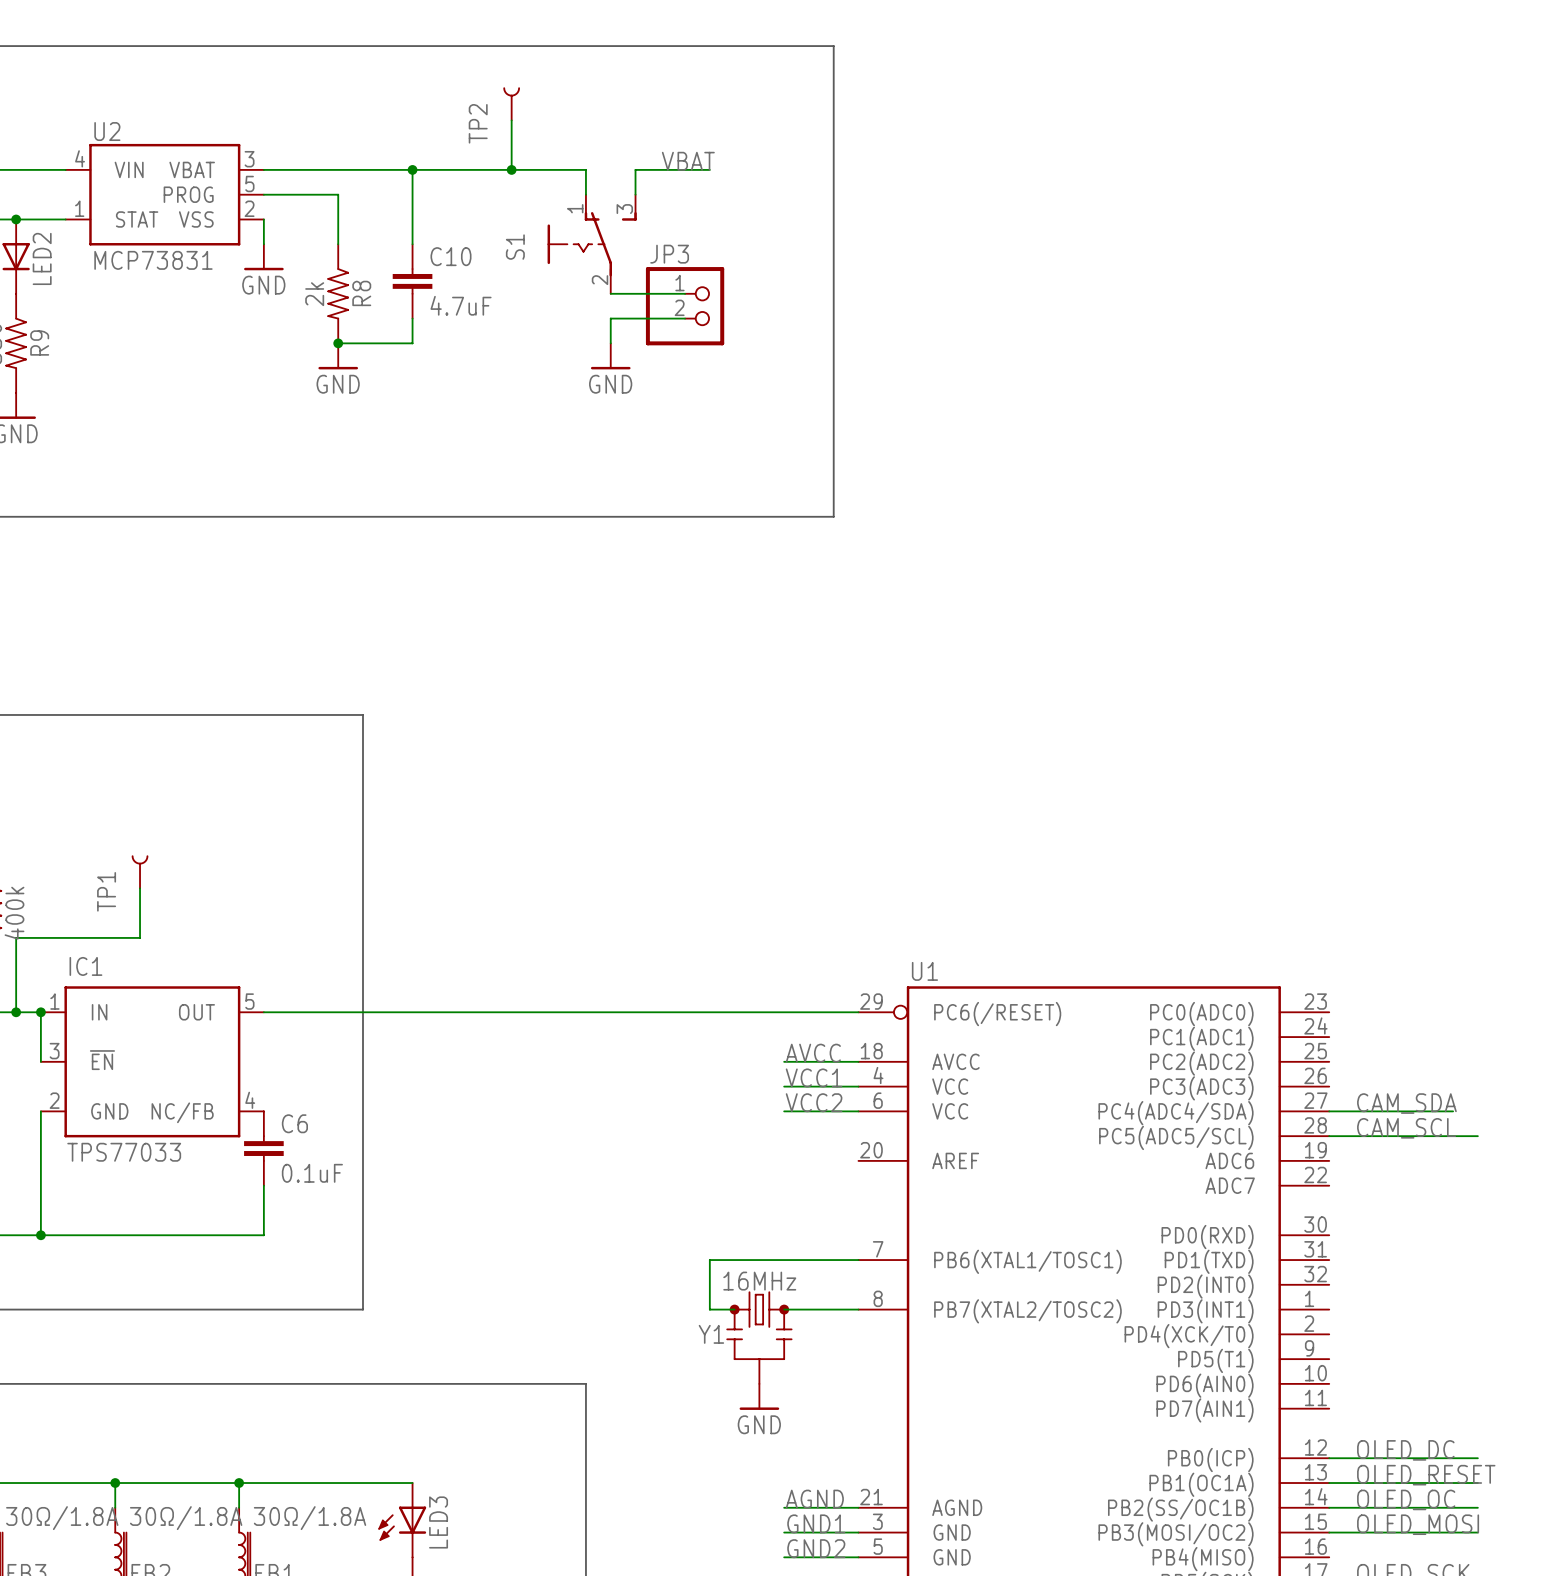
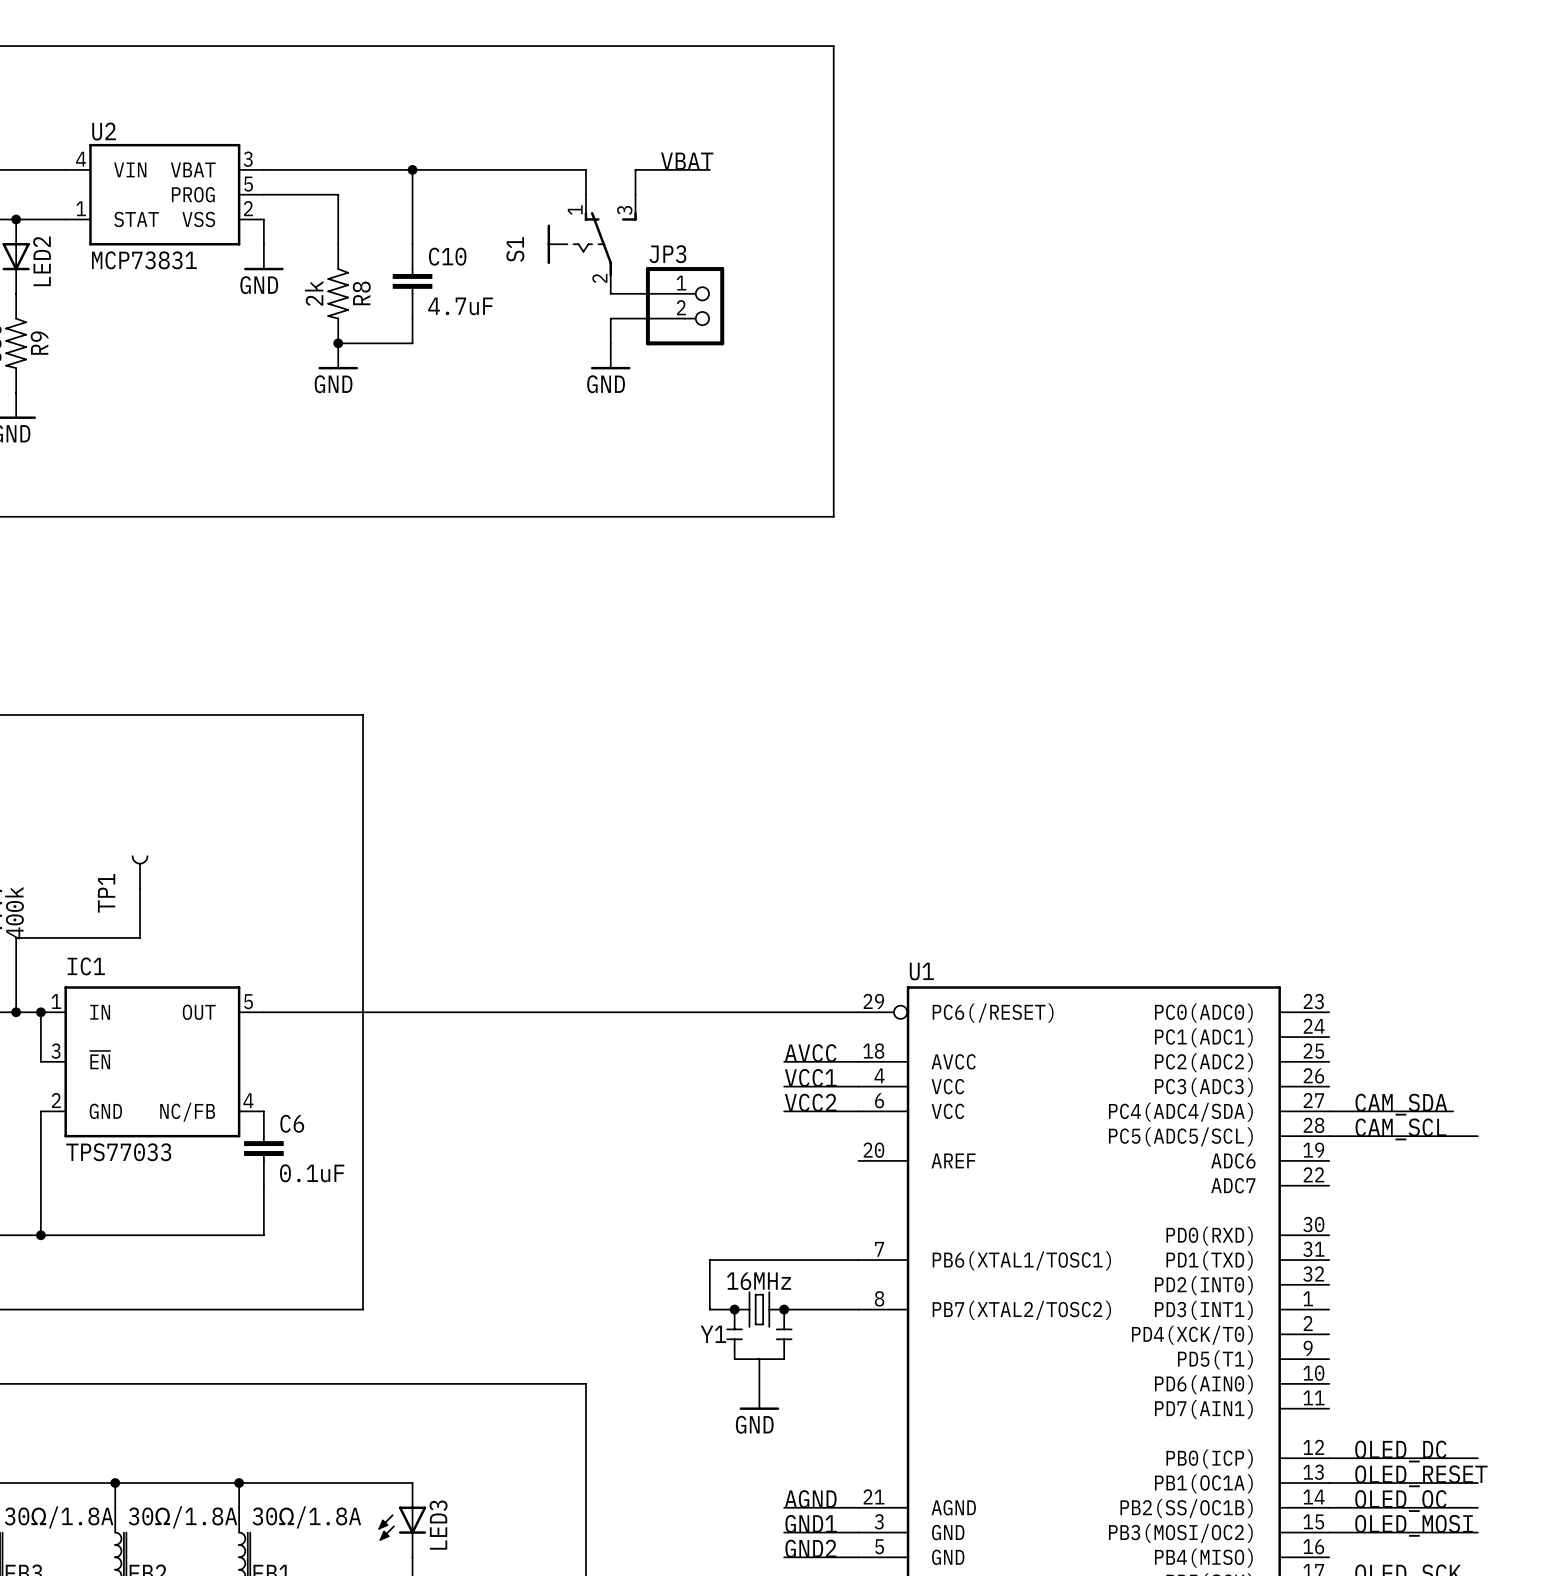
TP2: (511, 104) -> none
wire: (511, 120) (511, 169) -> none
junction: (511, 169) -> none

